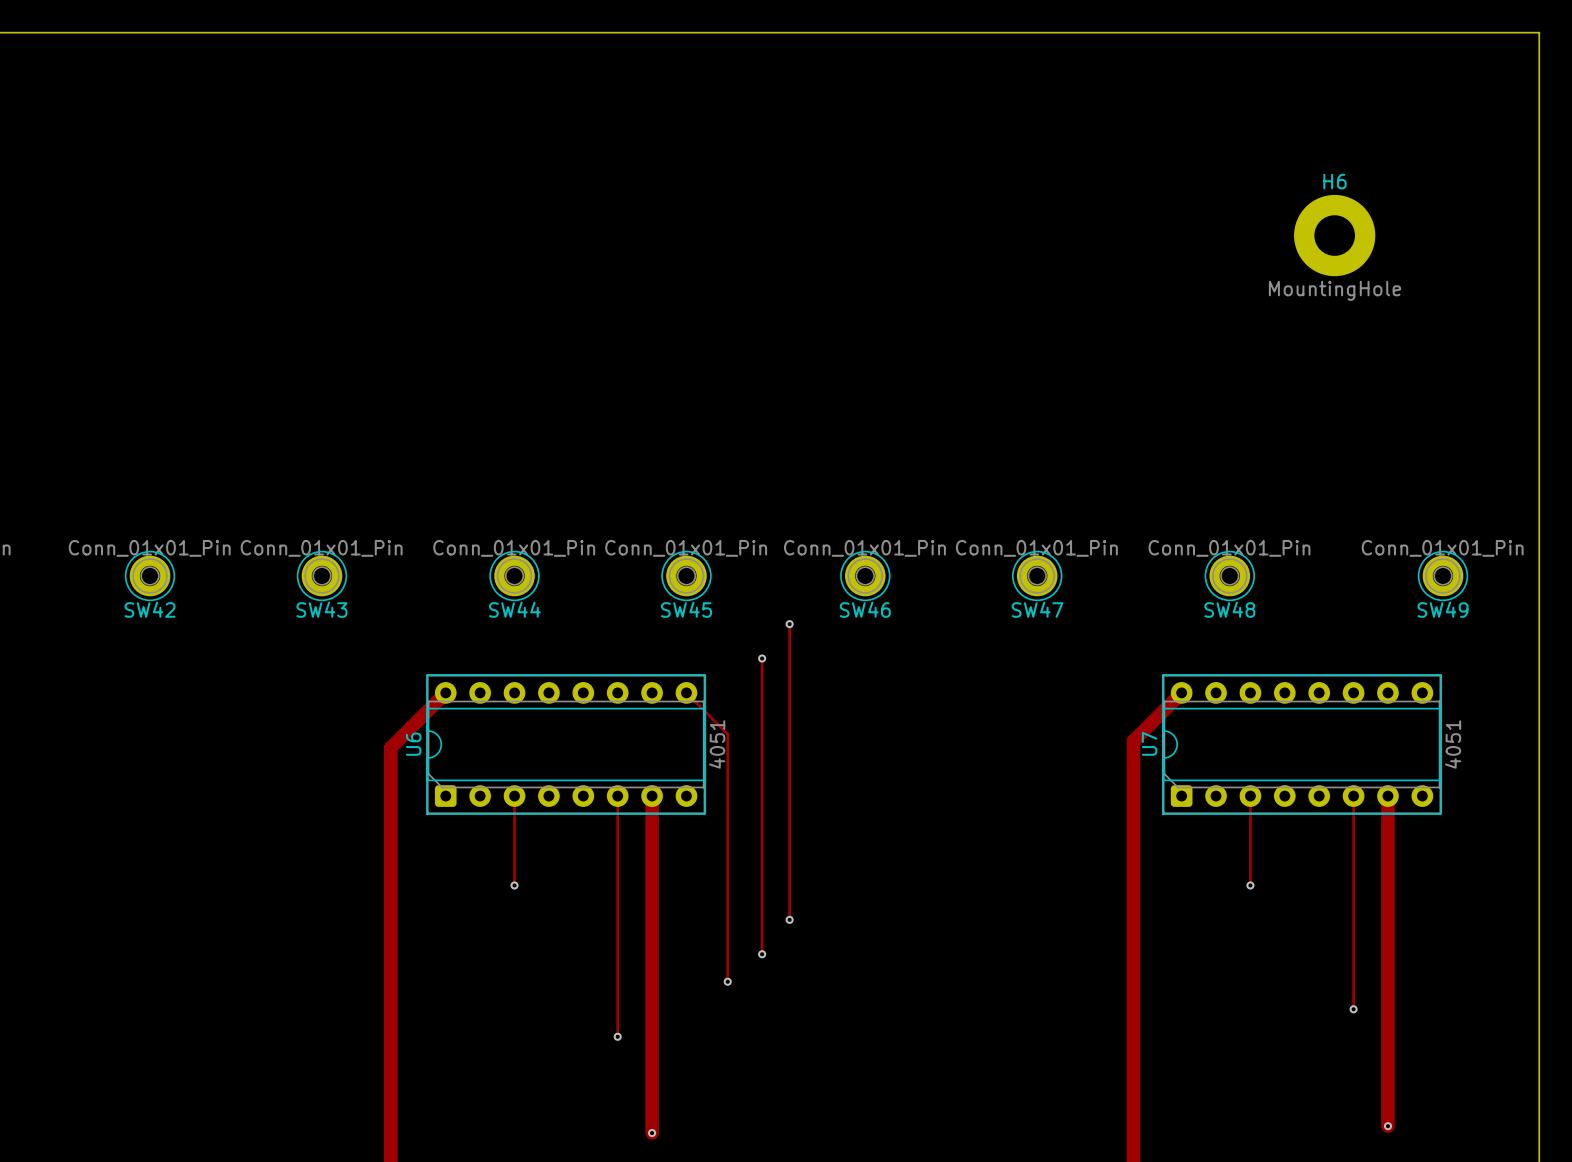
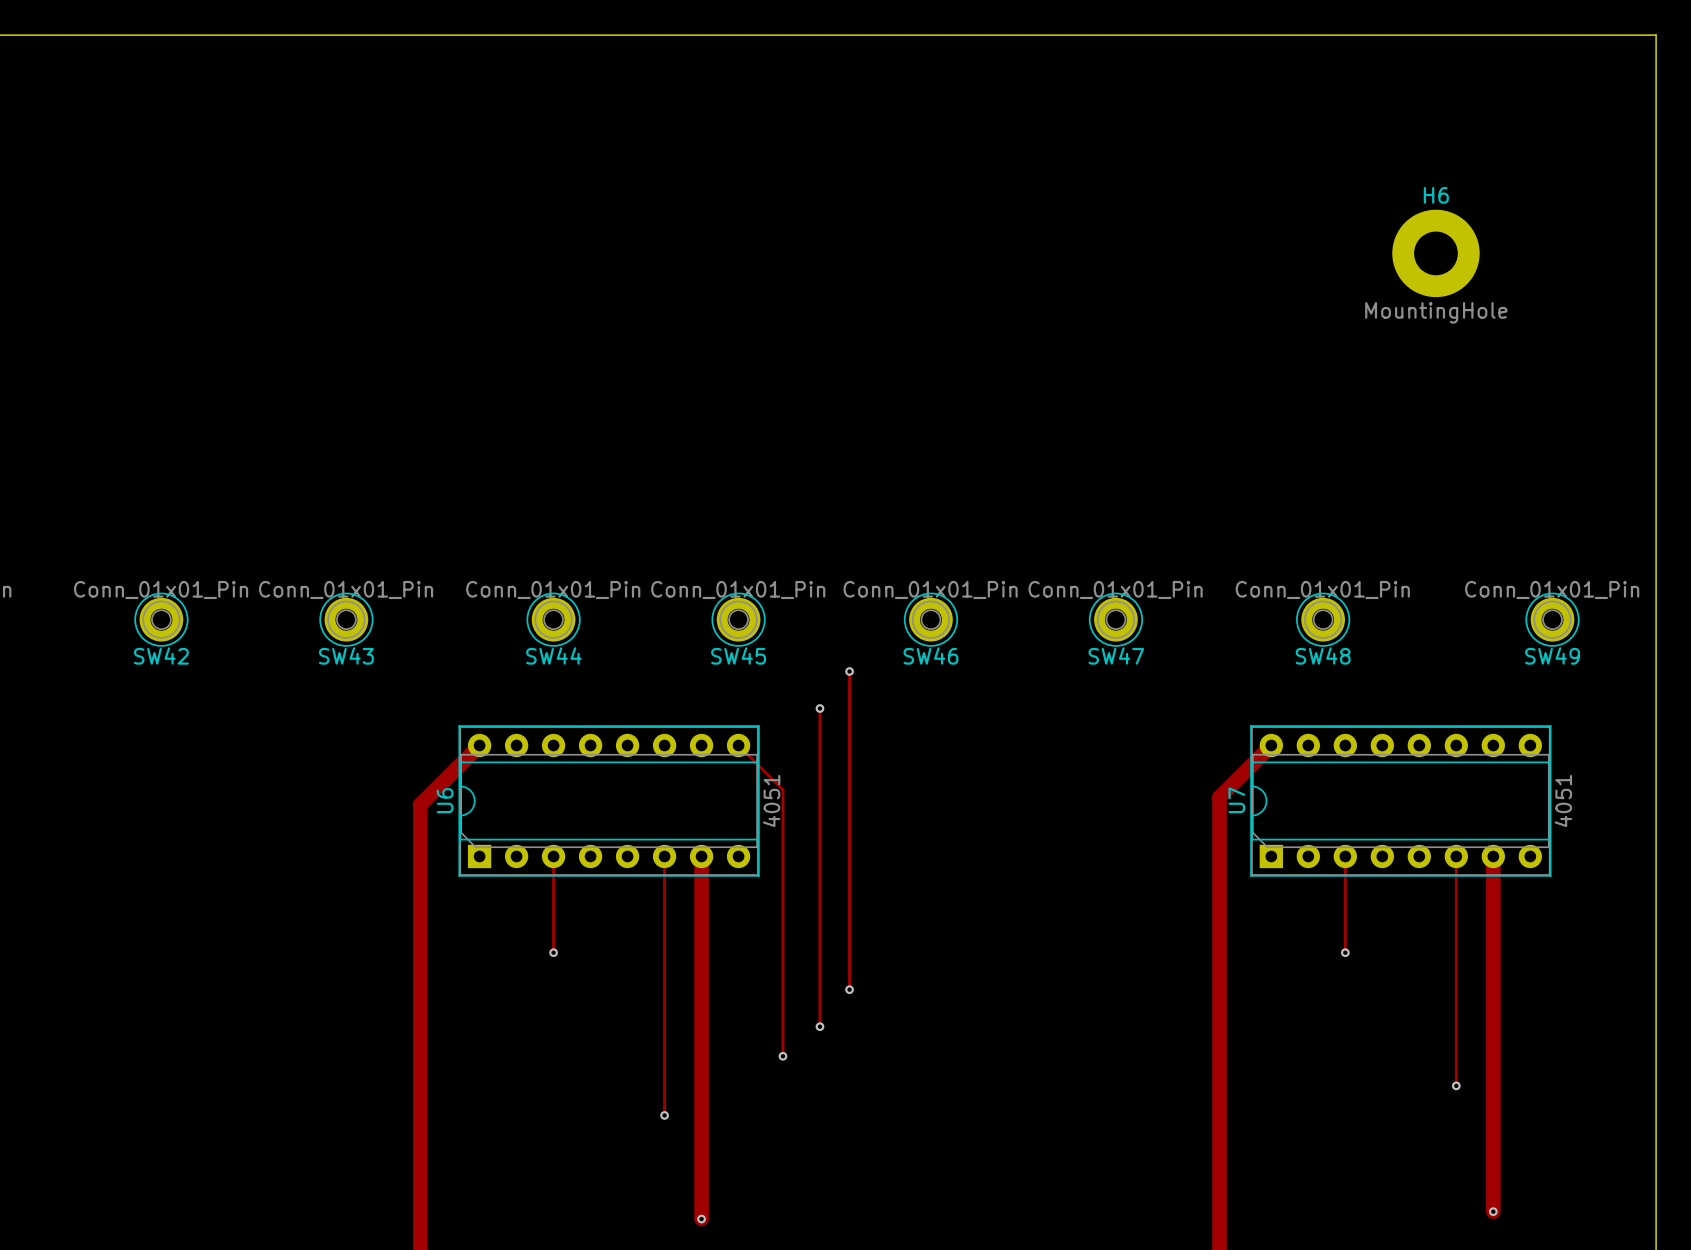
U6 footprint: [426, 674, 707, 815] -> [458, 725, 760, 877]
U7 footprint: [1162, 674, 1442, 815] -> [1250, 725, 1552, 877]

